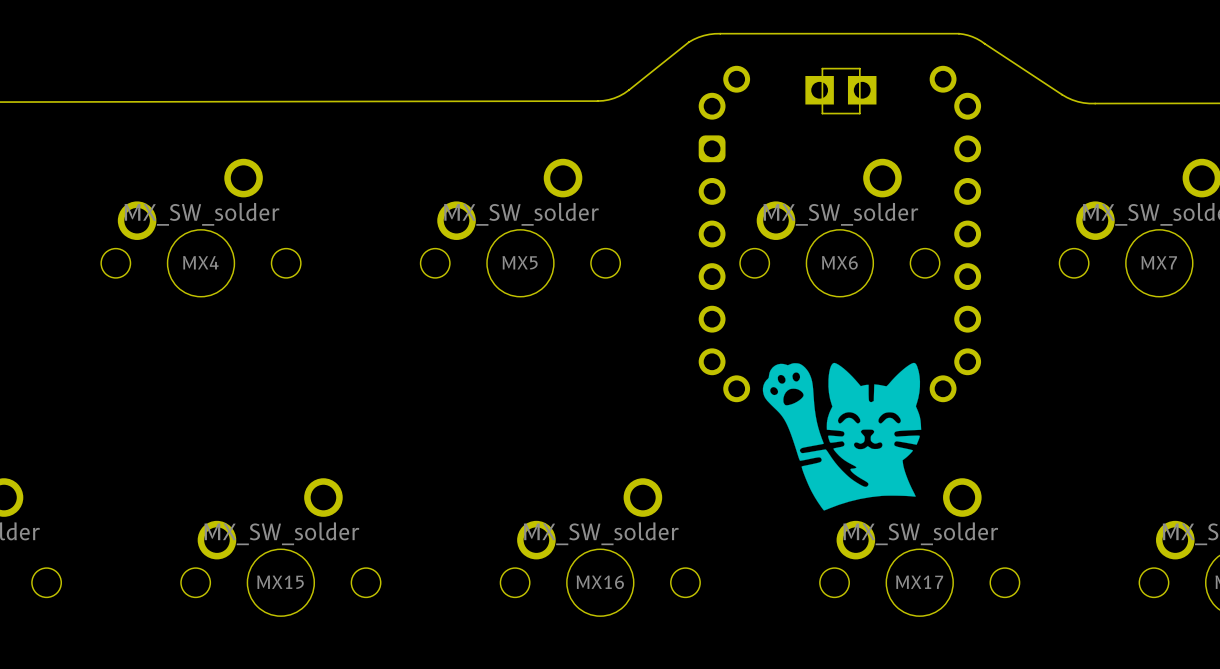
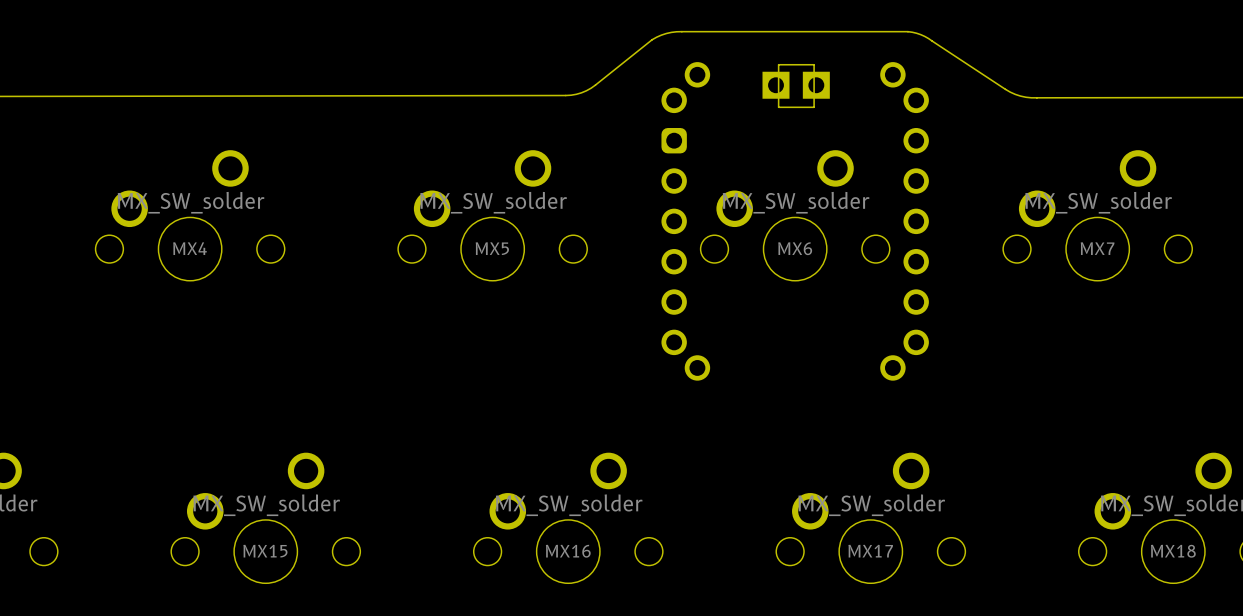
drawing: [762, 362, 922, 511] -> none

